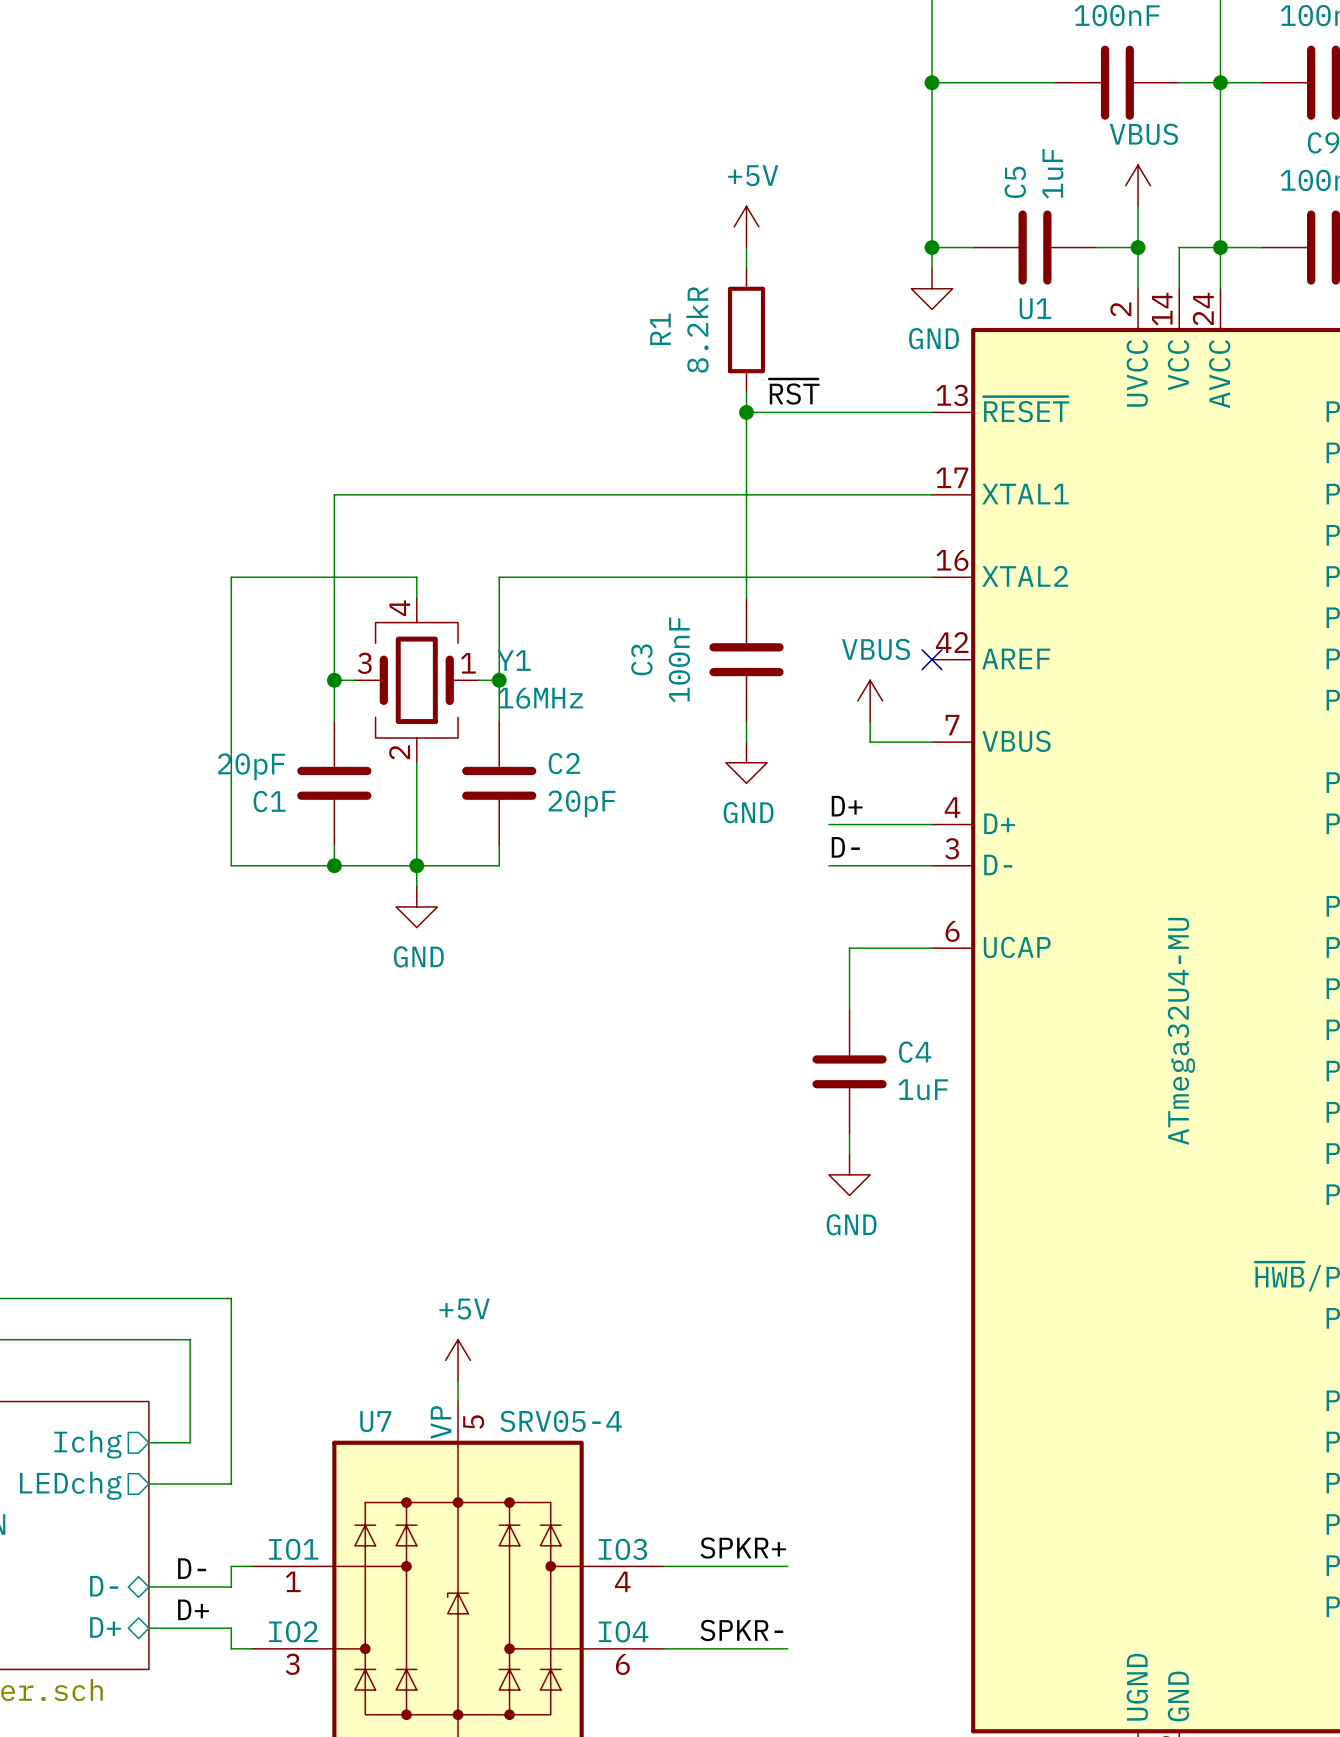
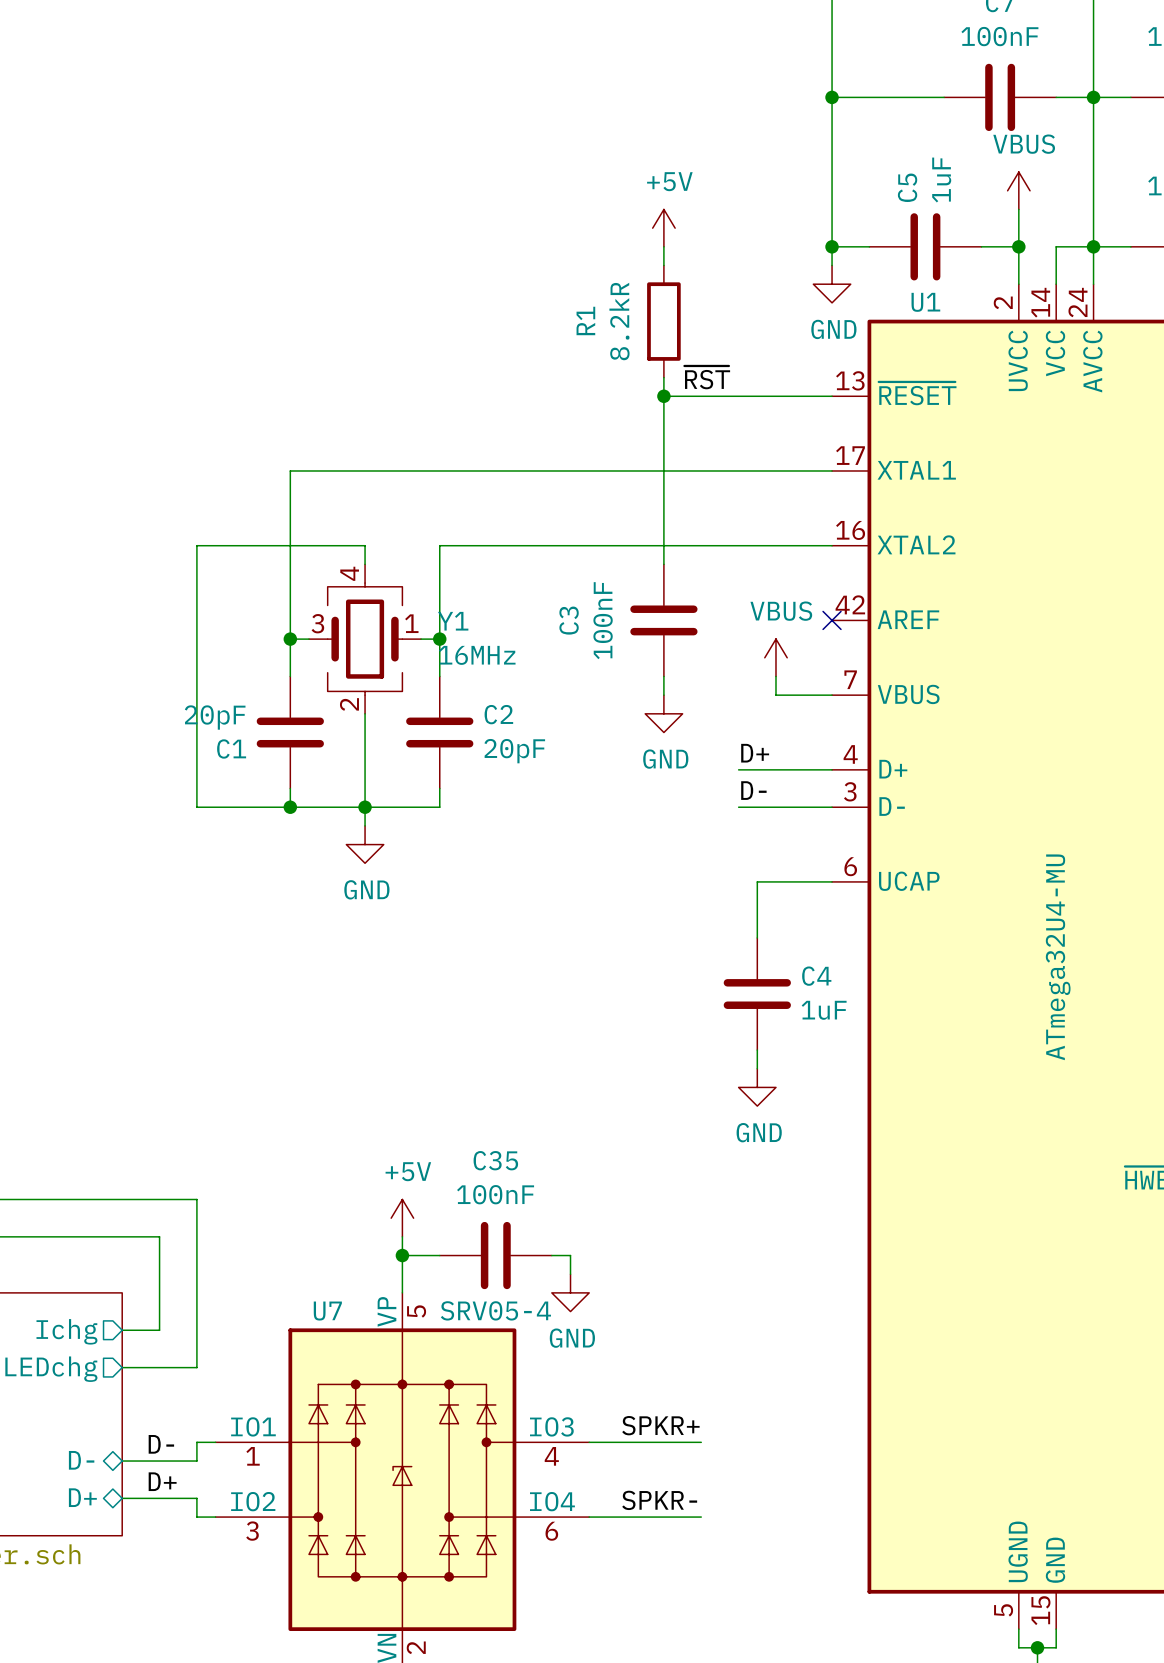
wire: none -> (402, 1255) (439, 1255)
power symbol position: +5V (458, 1360) -> +5V (402, 1218)
junction: none -> (402, 1255)
C35: none -> 100nF (495, 1255)
wire: none -> (551, 1255) (570, 1255) (570, 1274)
power symbol: none -> GND (570, 1292)

